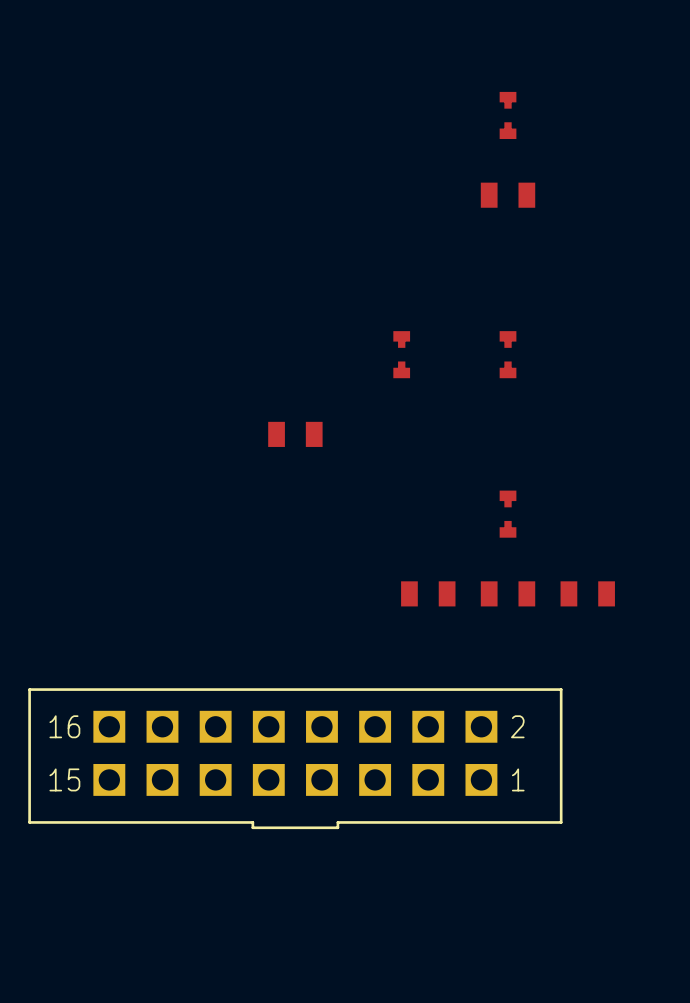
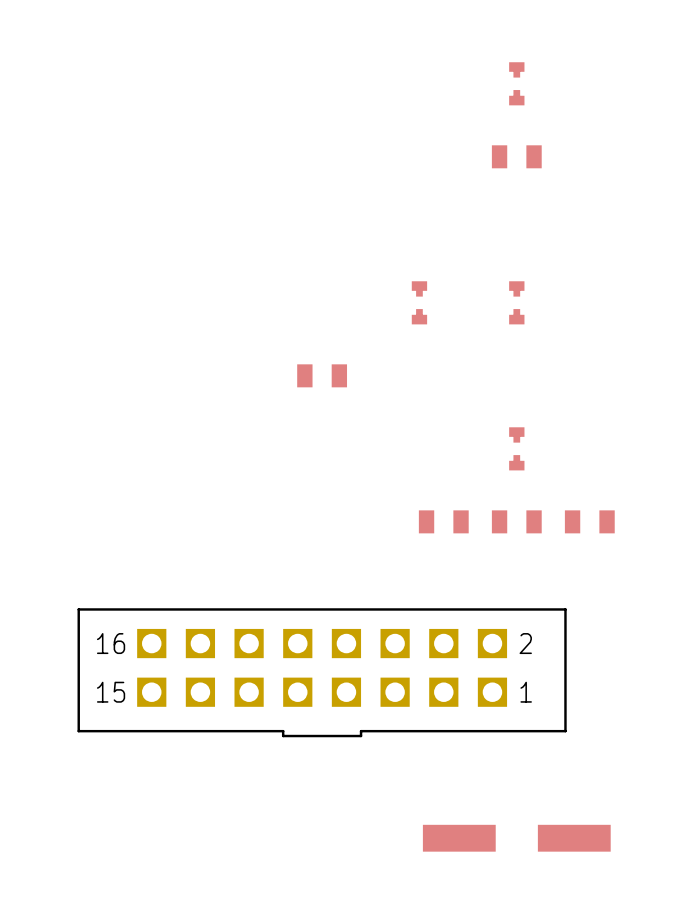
part: none -> (516, 838)

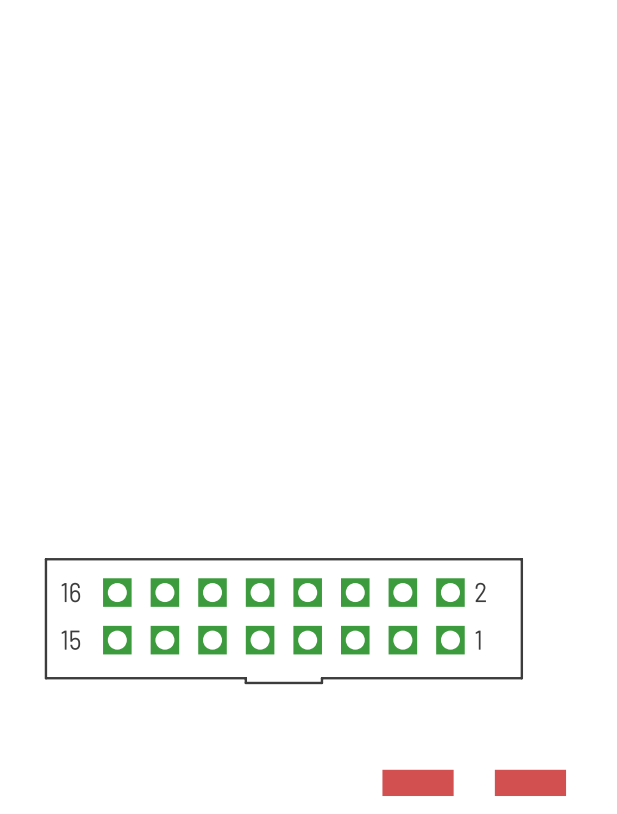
part: (516, 83) -> none
part: (516, 156) -> none
part: (419, 302) -> none
part: (516, 302) -> none
part: (322, 375) -> none
part: (516, 448) -> none
part: (443, 521) -> none
part: (516, 521) -> none
part: (589, 521) -> none

